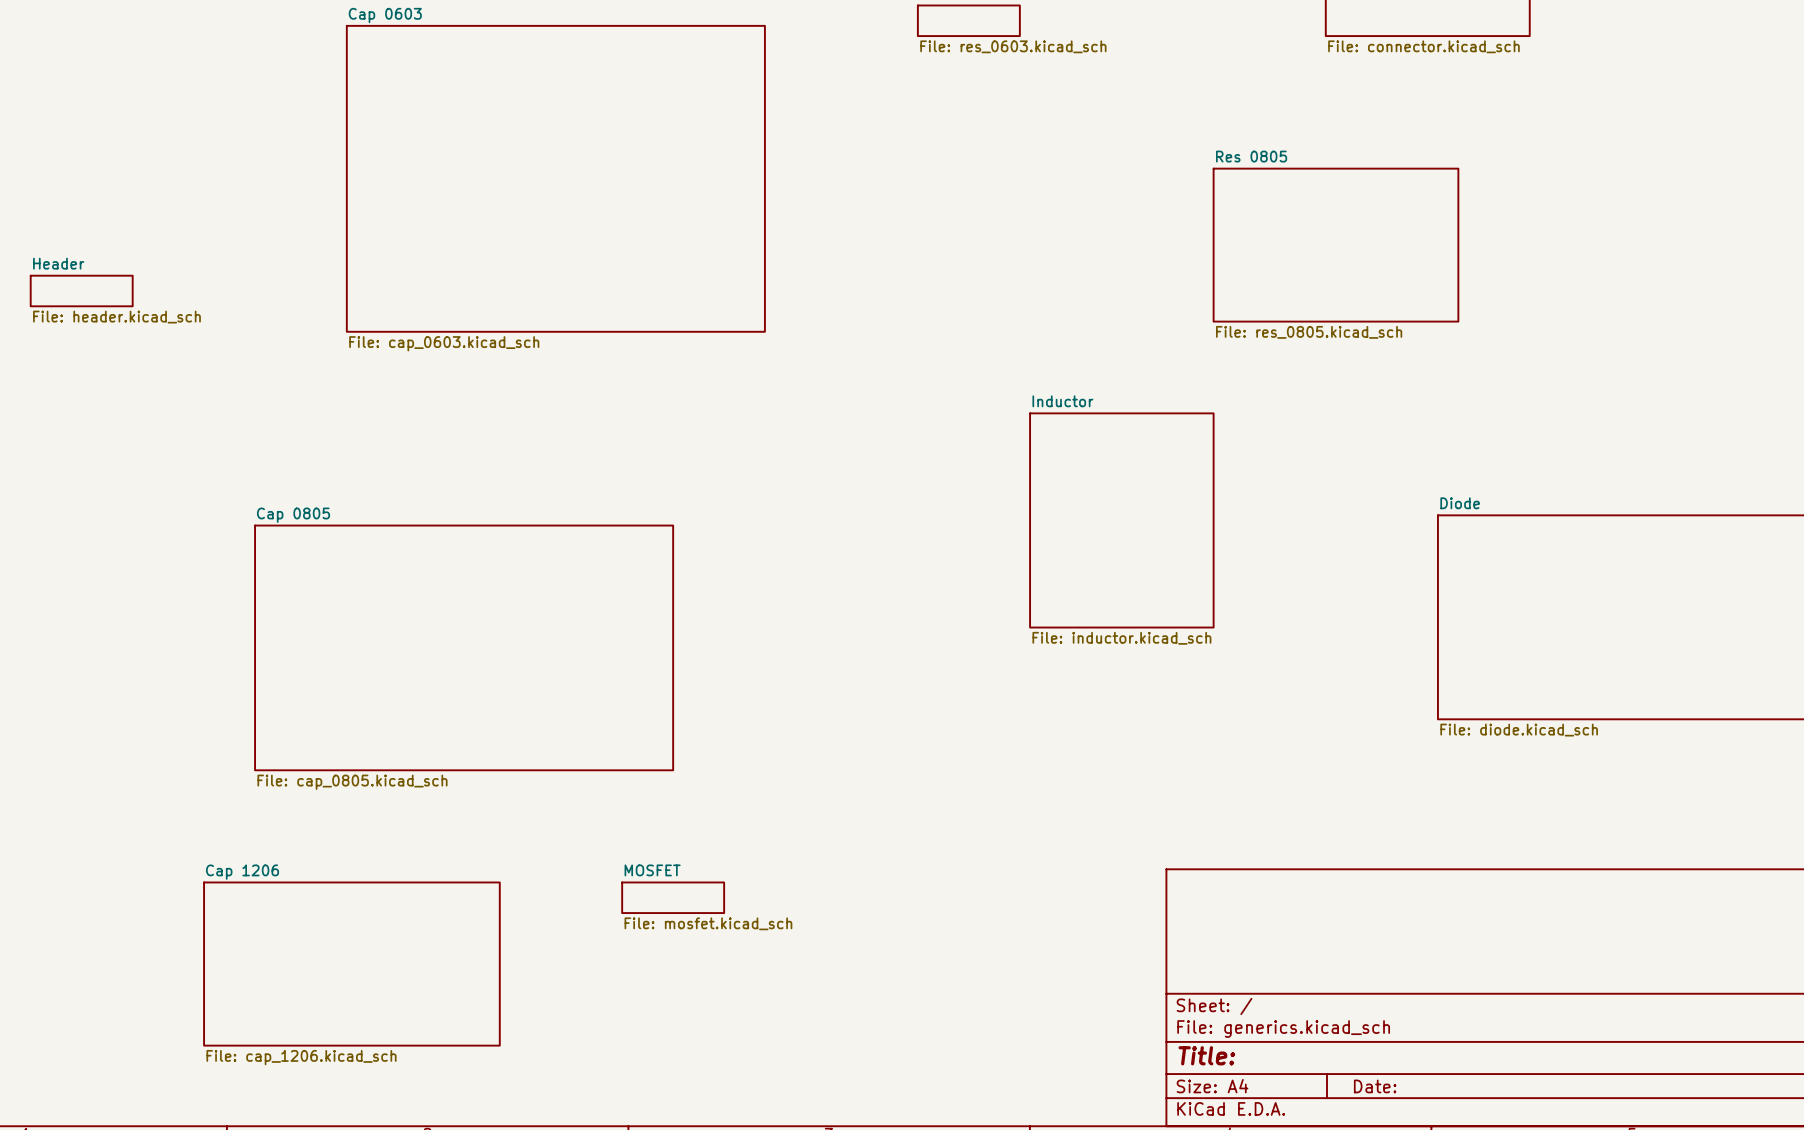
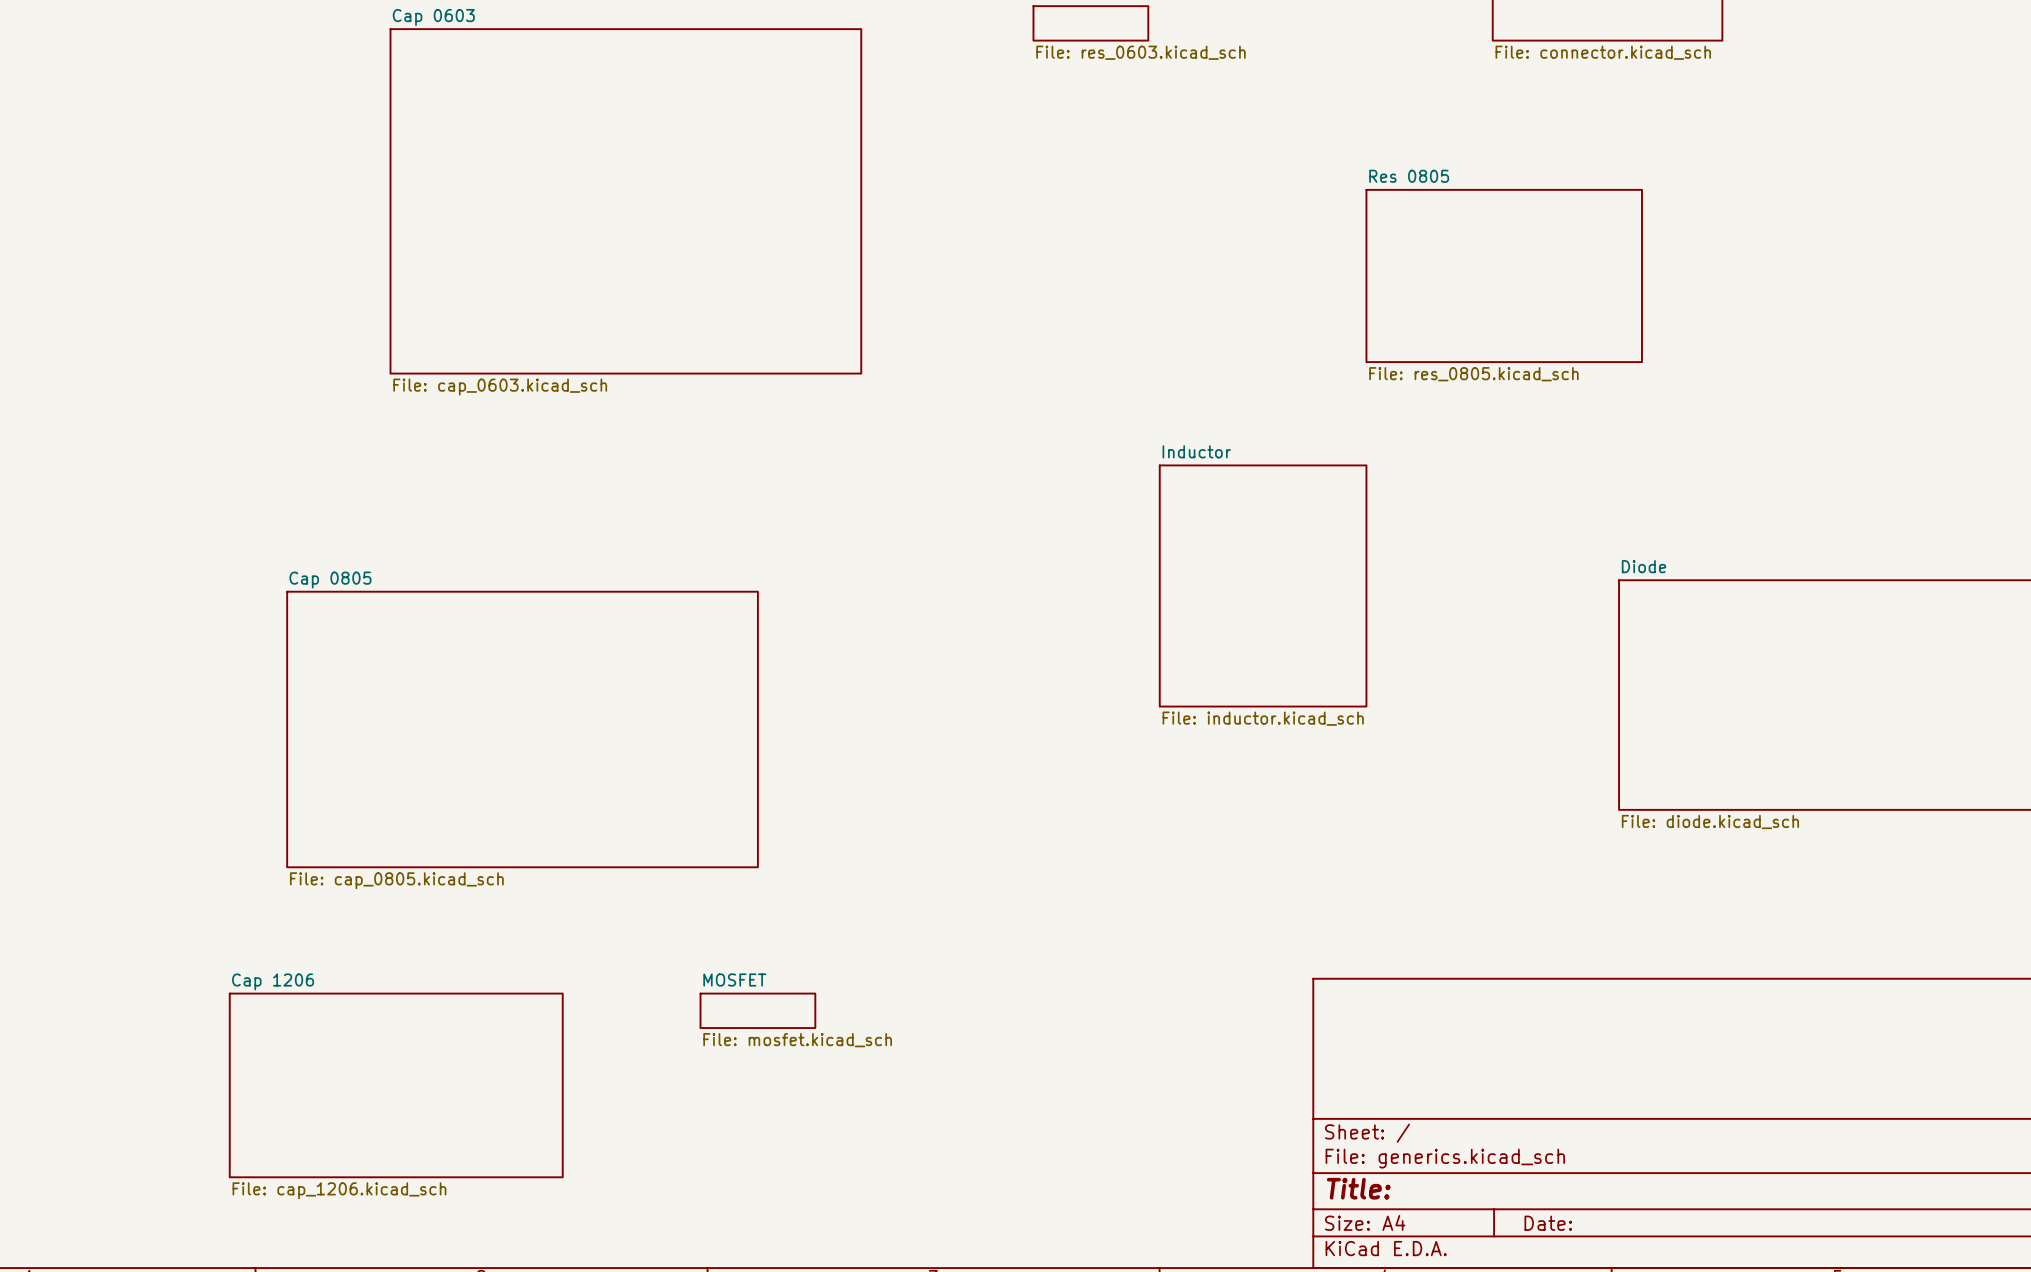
sheet Header: File: header.kicad_sch (81, 291) -> none

